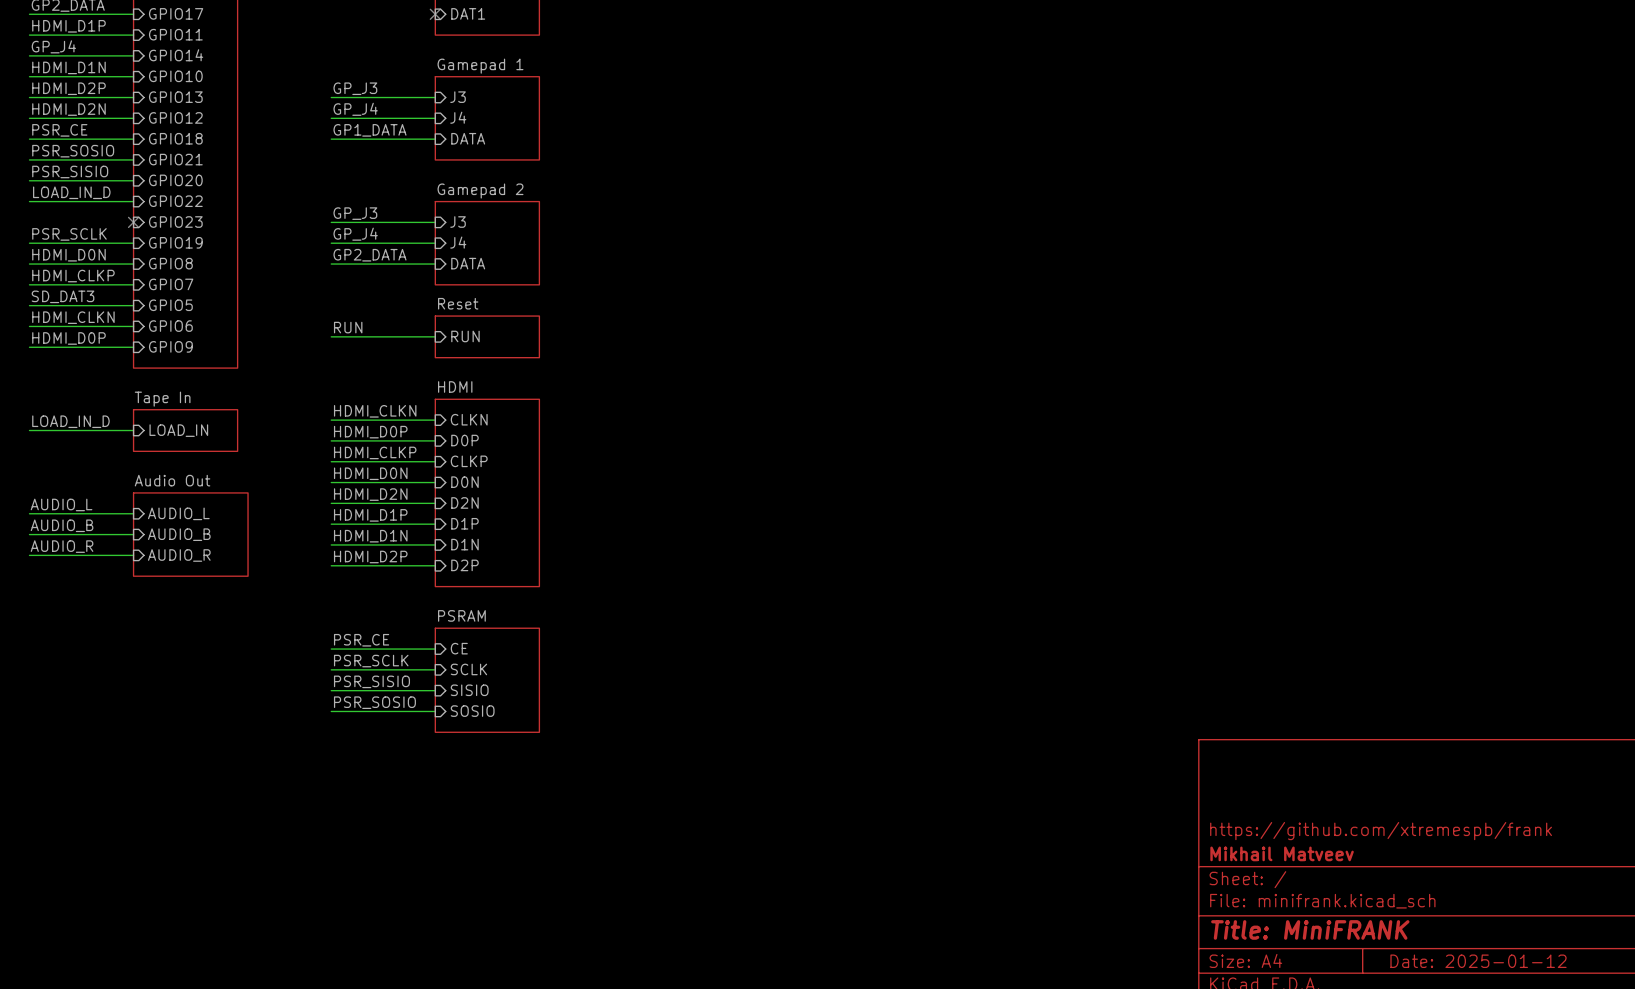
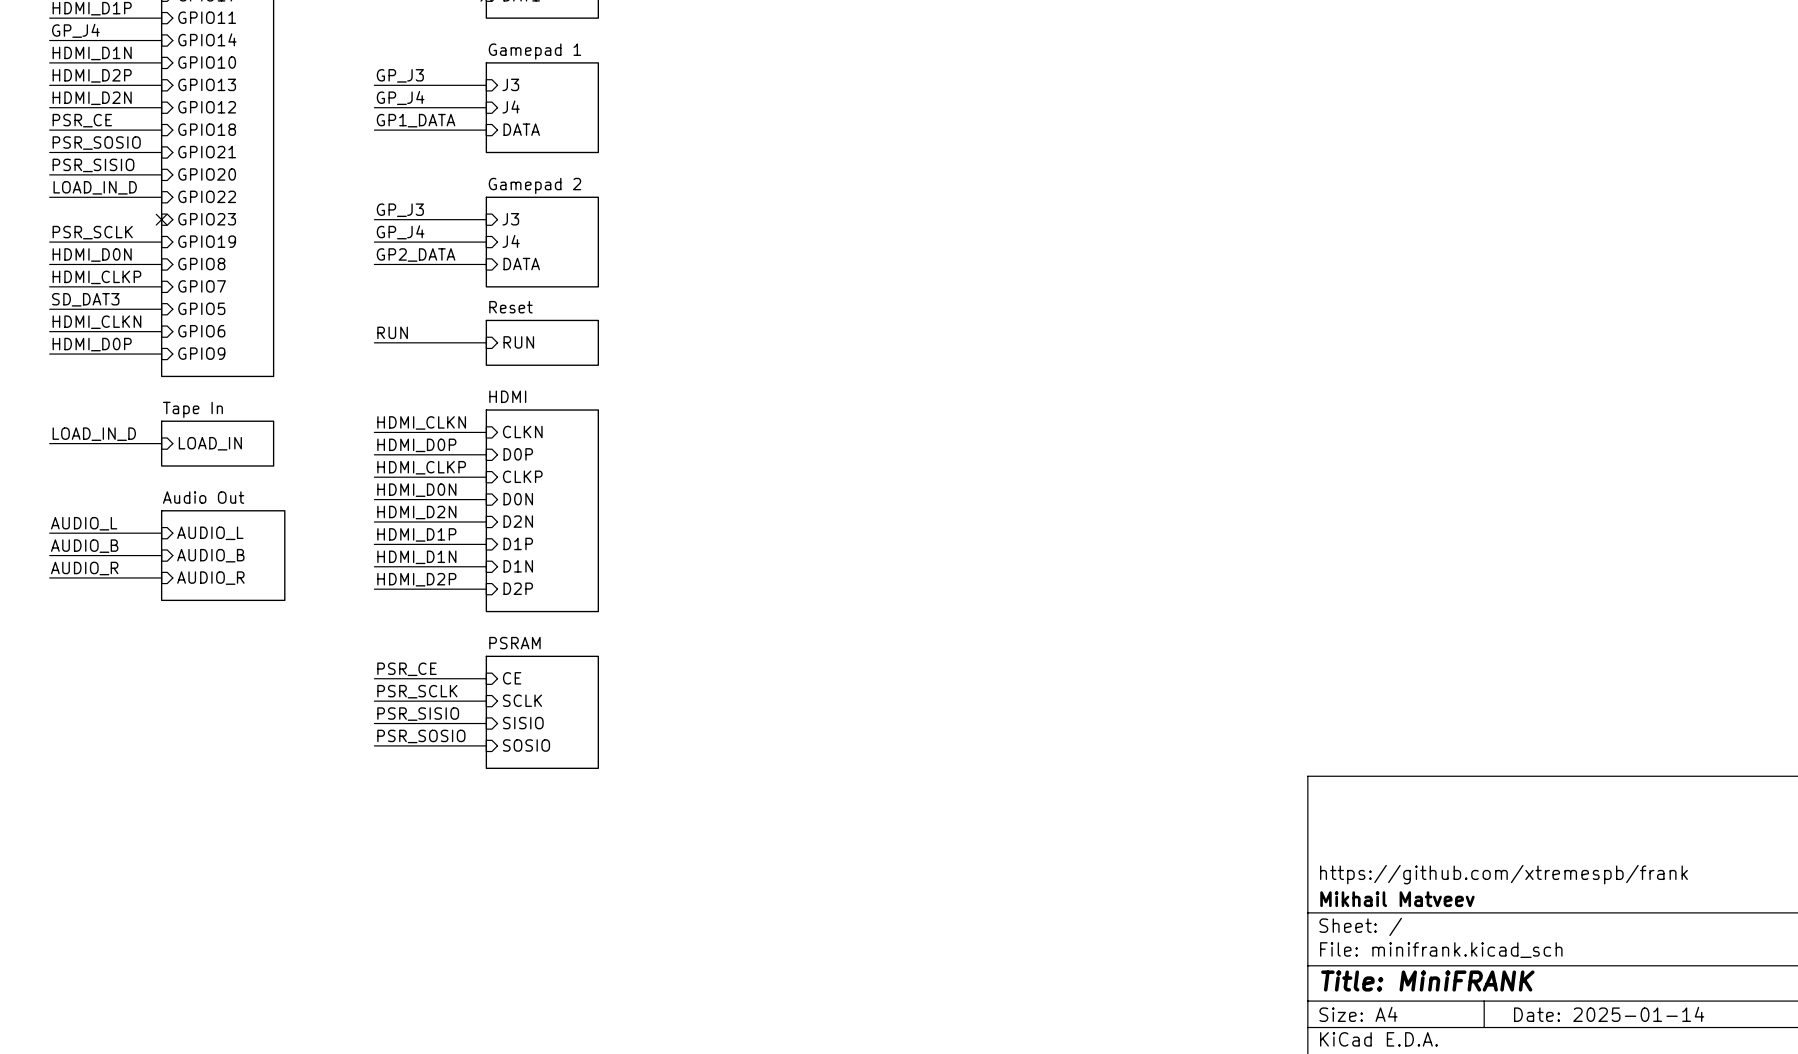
title block: Date: 2025-01-12 (1478, 961) -> Date: 2025-01-14 (1609, 1014)

